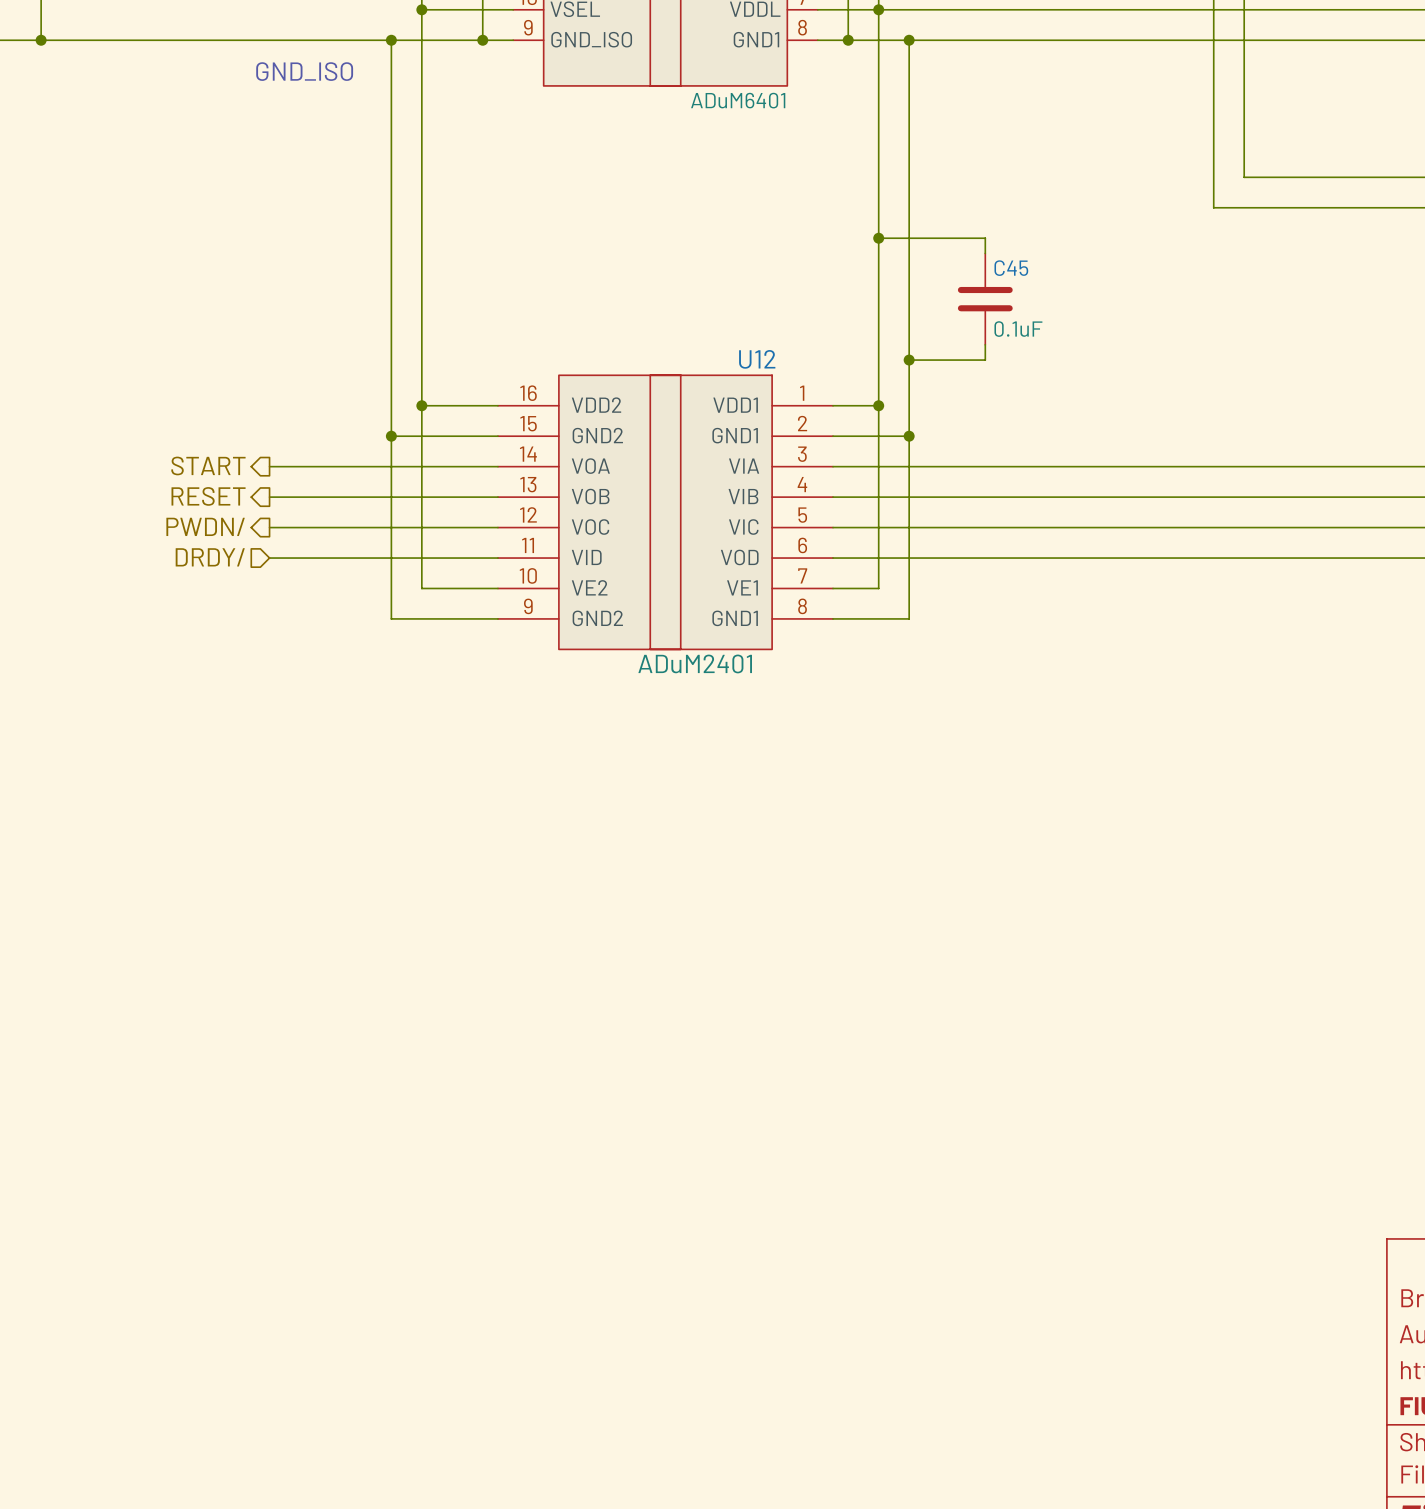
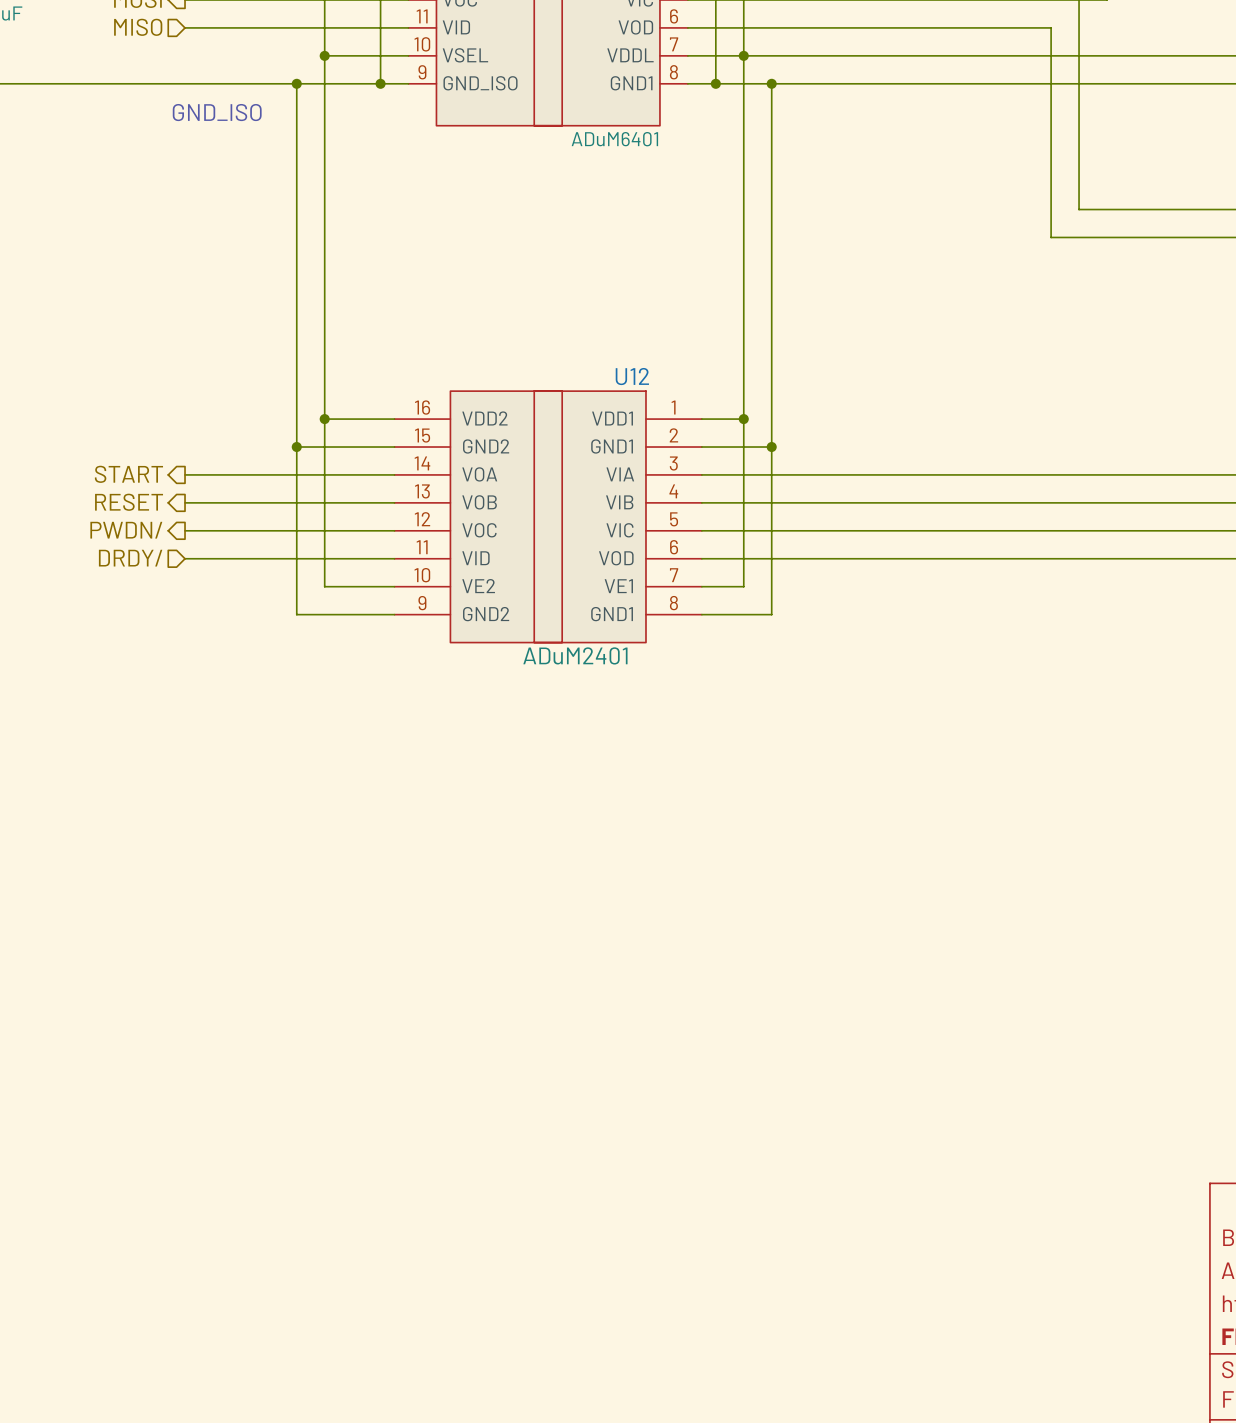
wire: (878, 238) (985, 238) (985, 253) -> none
junction: (878, 238) -> none
C45: 0.1uF (985, 299) -> none
wire: (985, 344) (985, 360) (909, 360) -> none
junction: (909, 360) -> none

